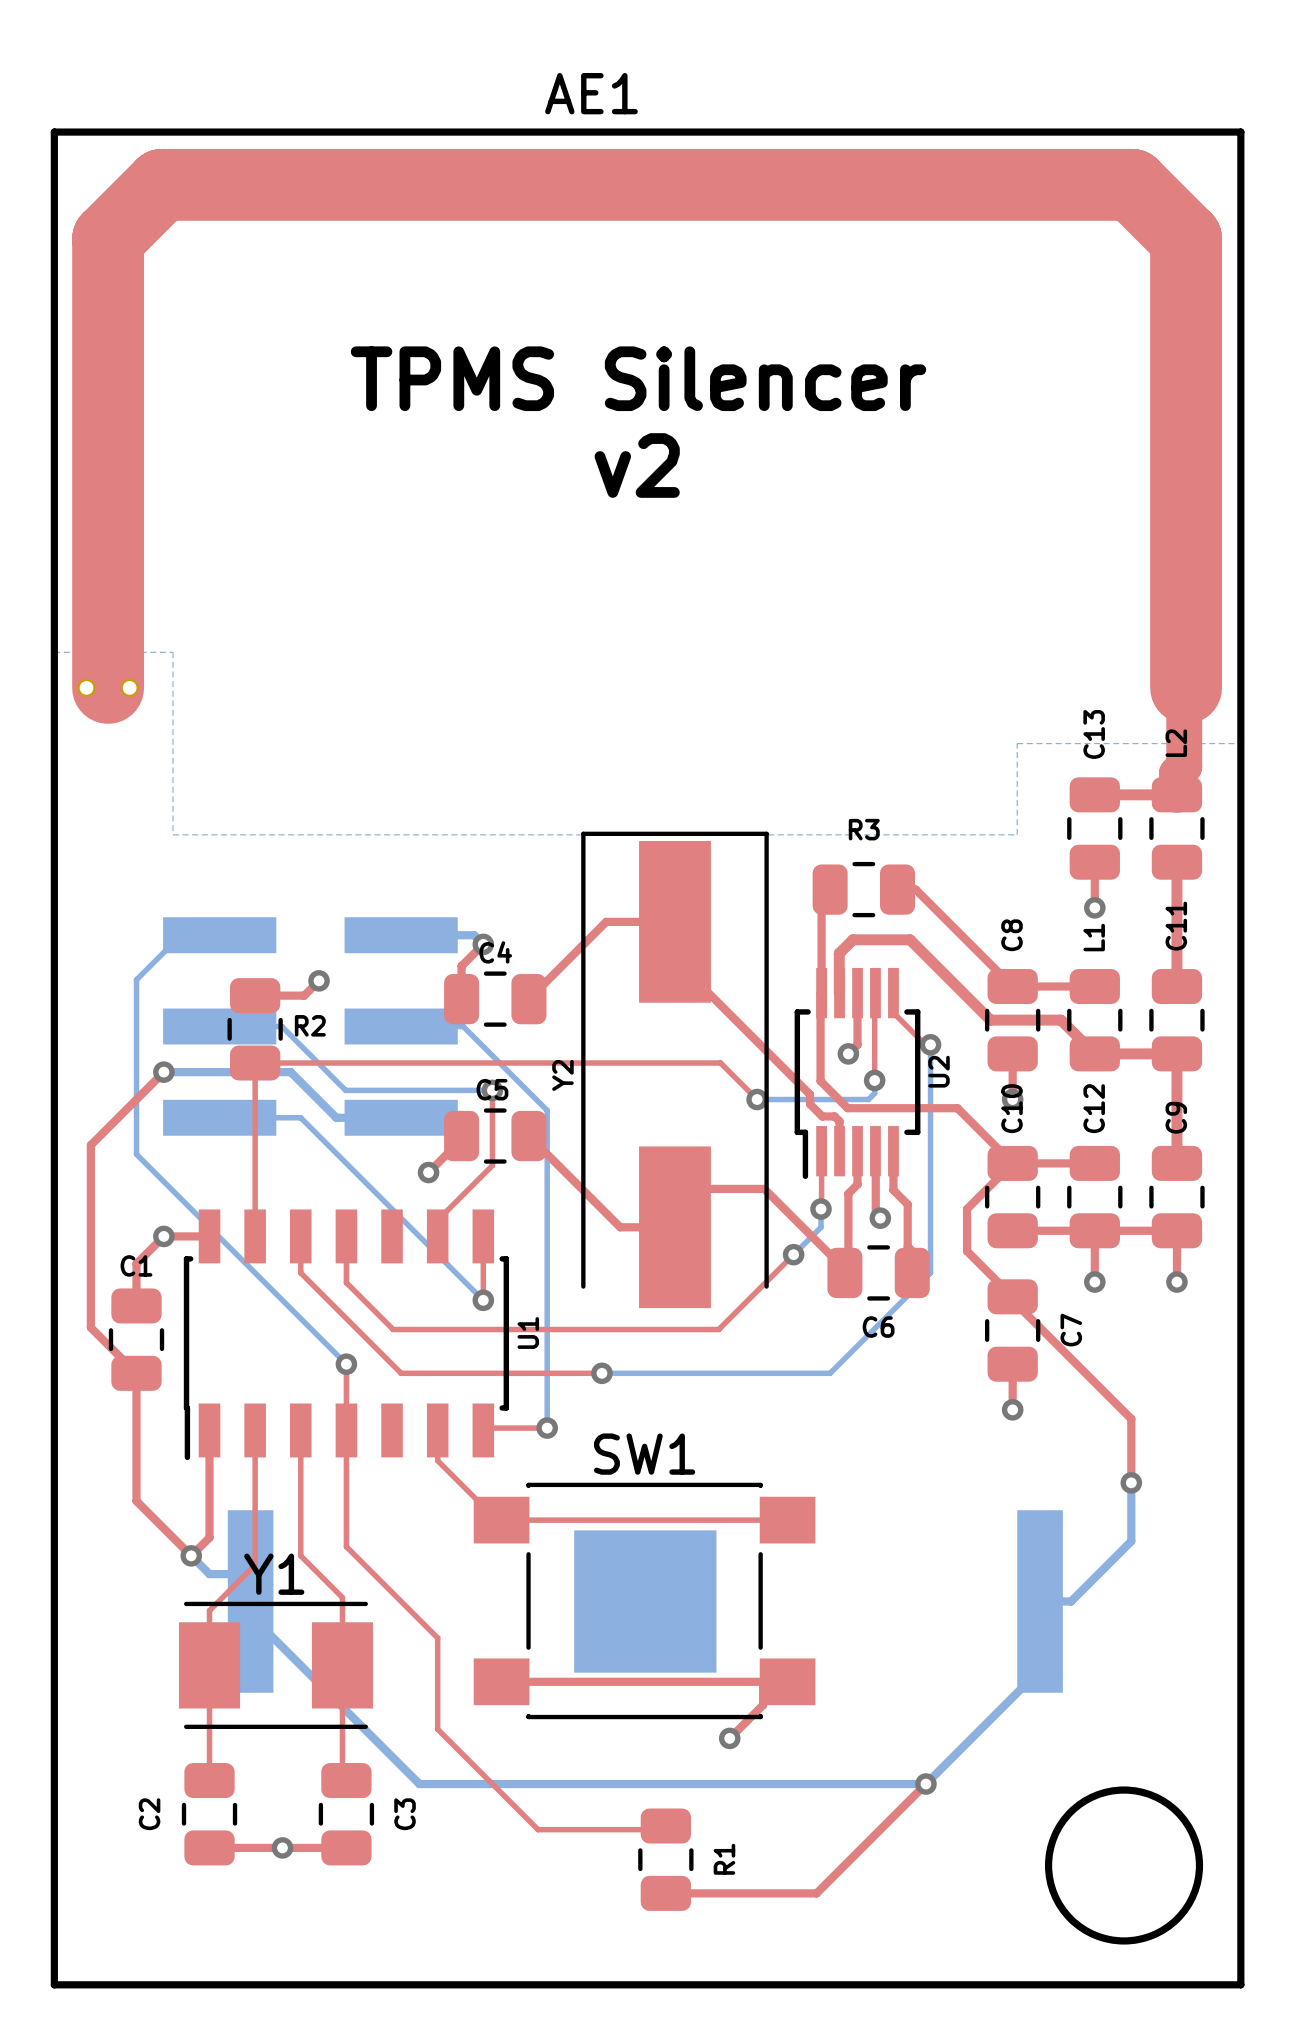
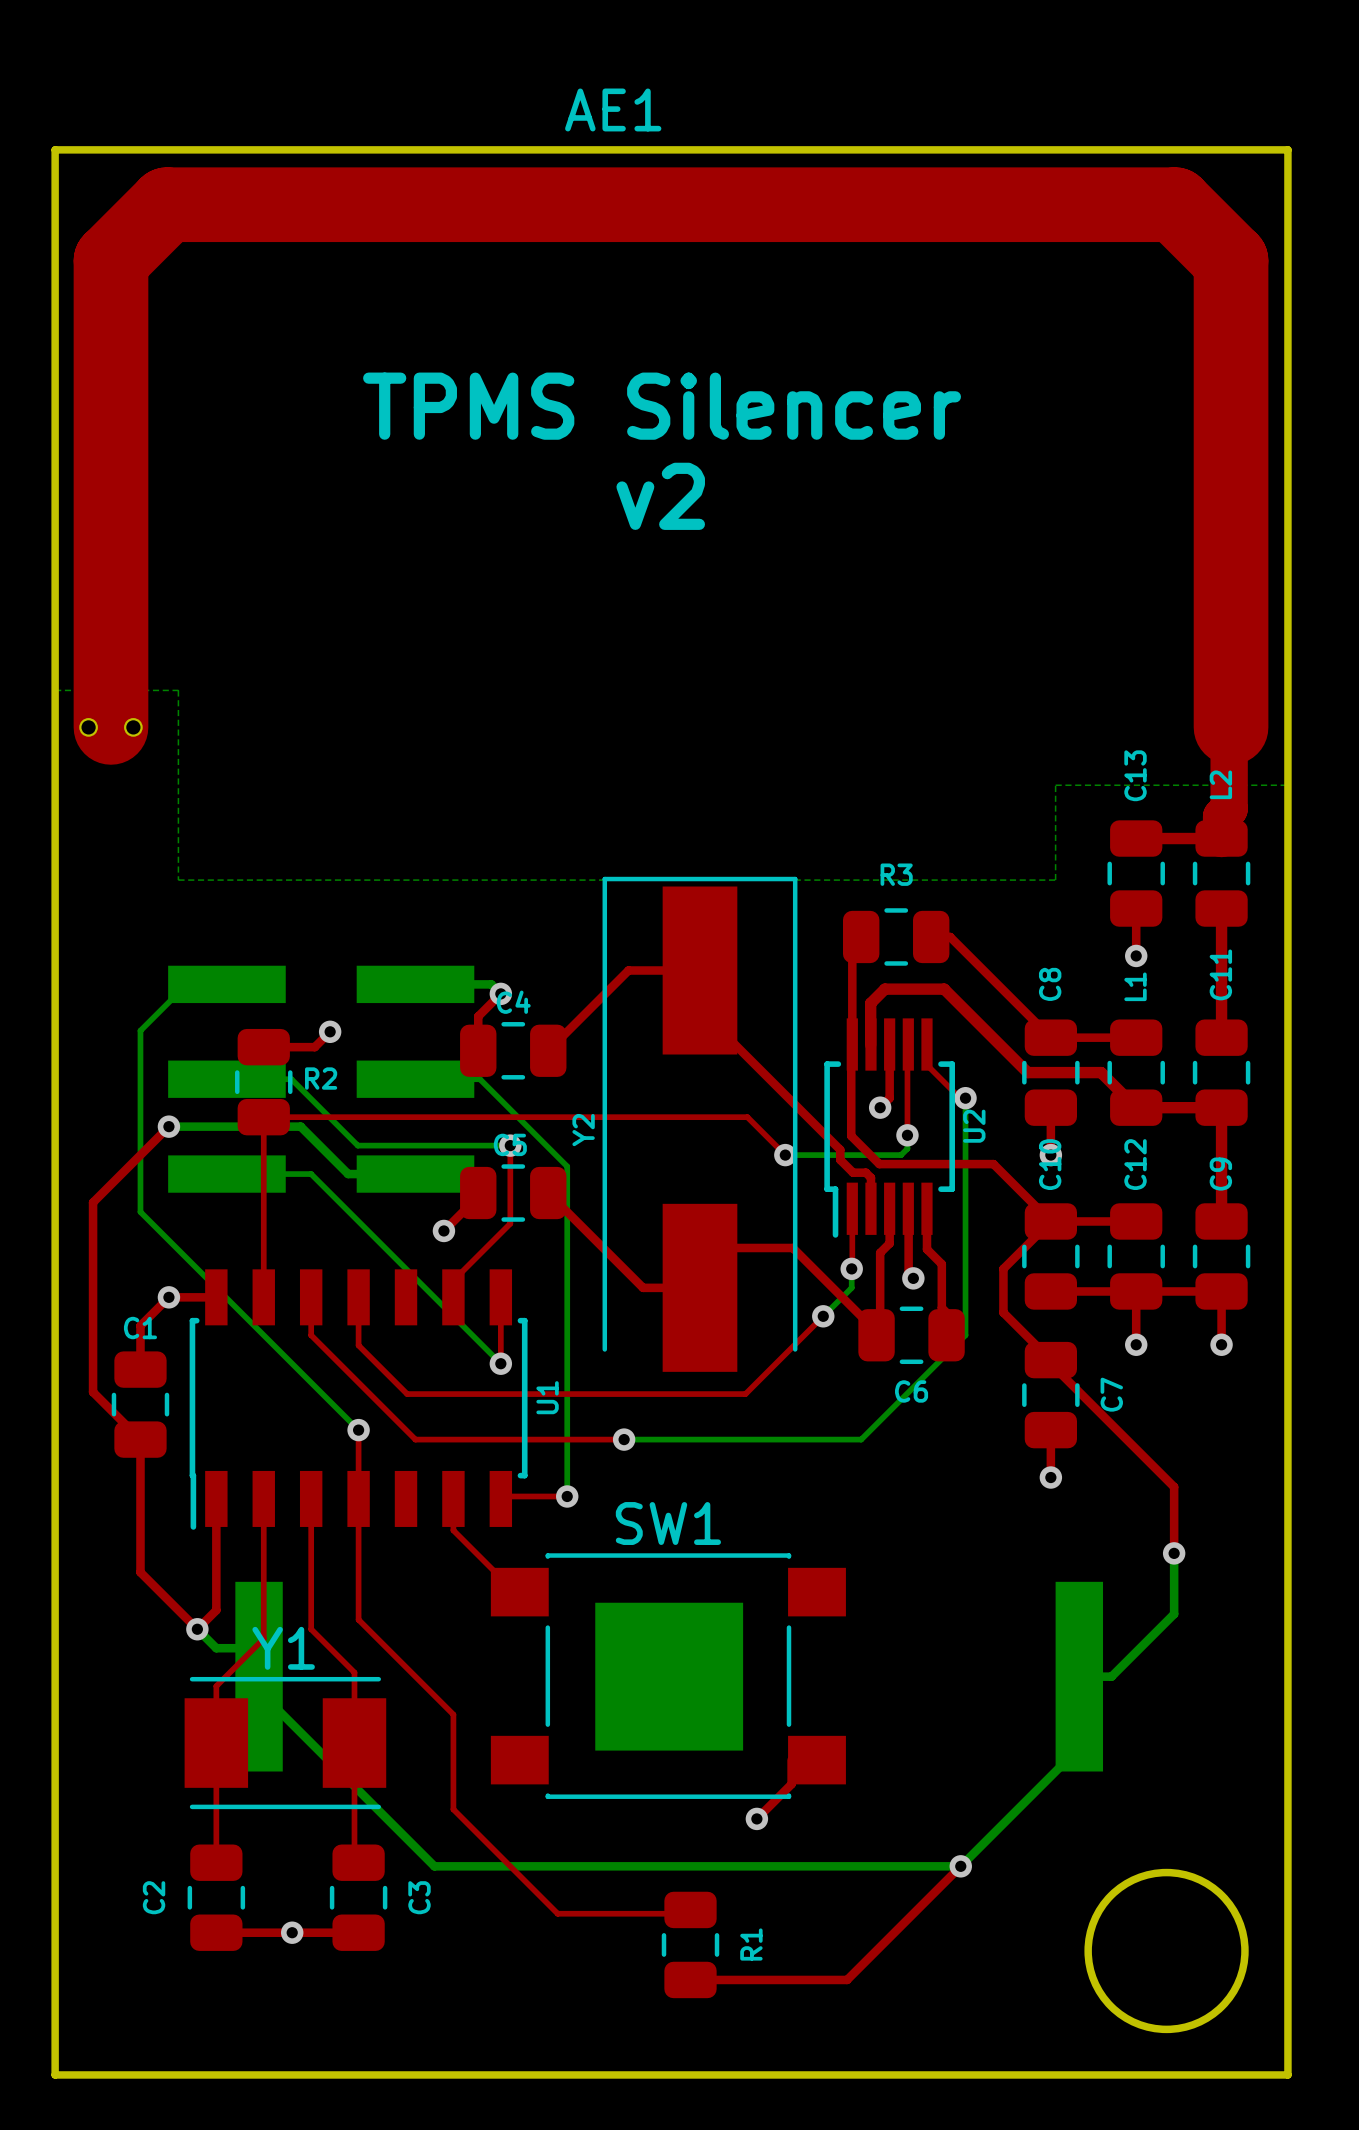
top track: (501, 1520) (787, 1520) -> none
top track: (501, 1681) (787, 1681) -> none

